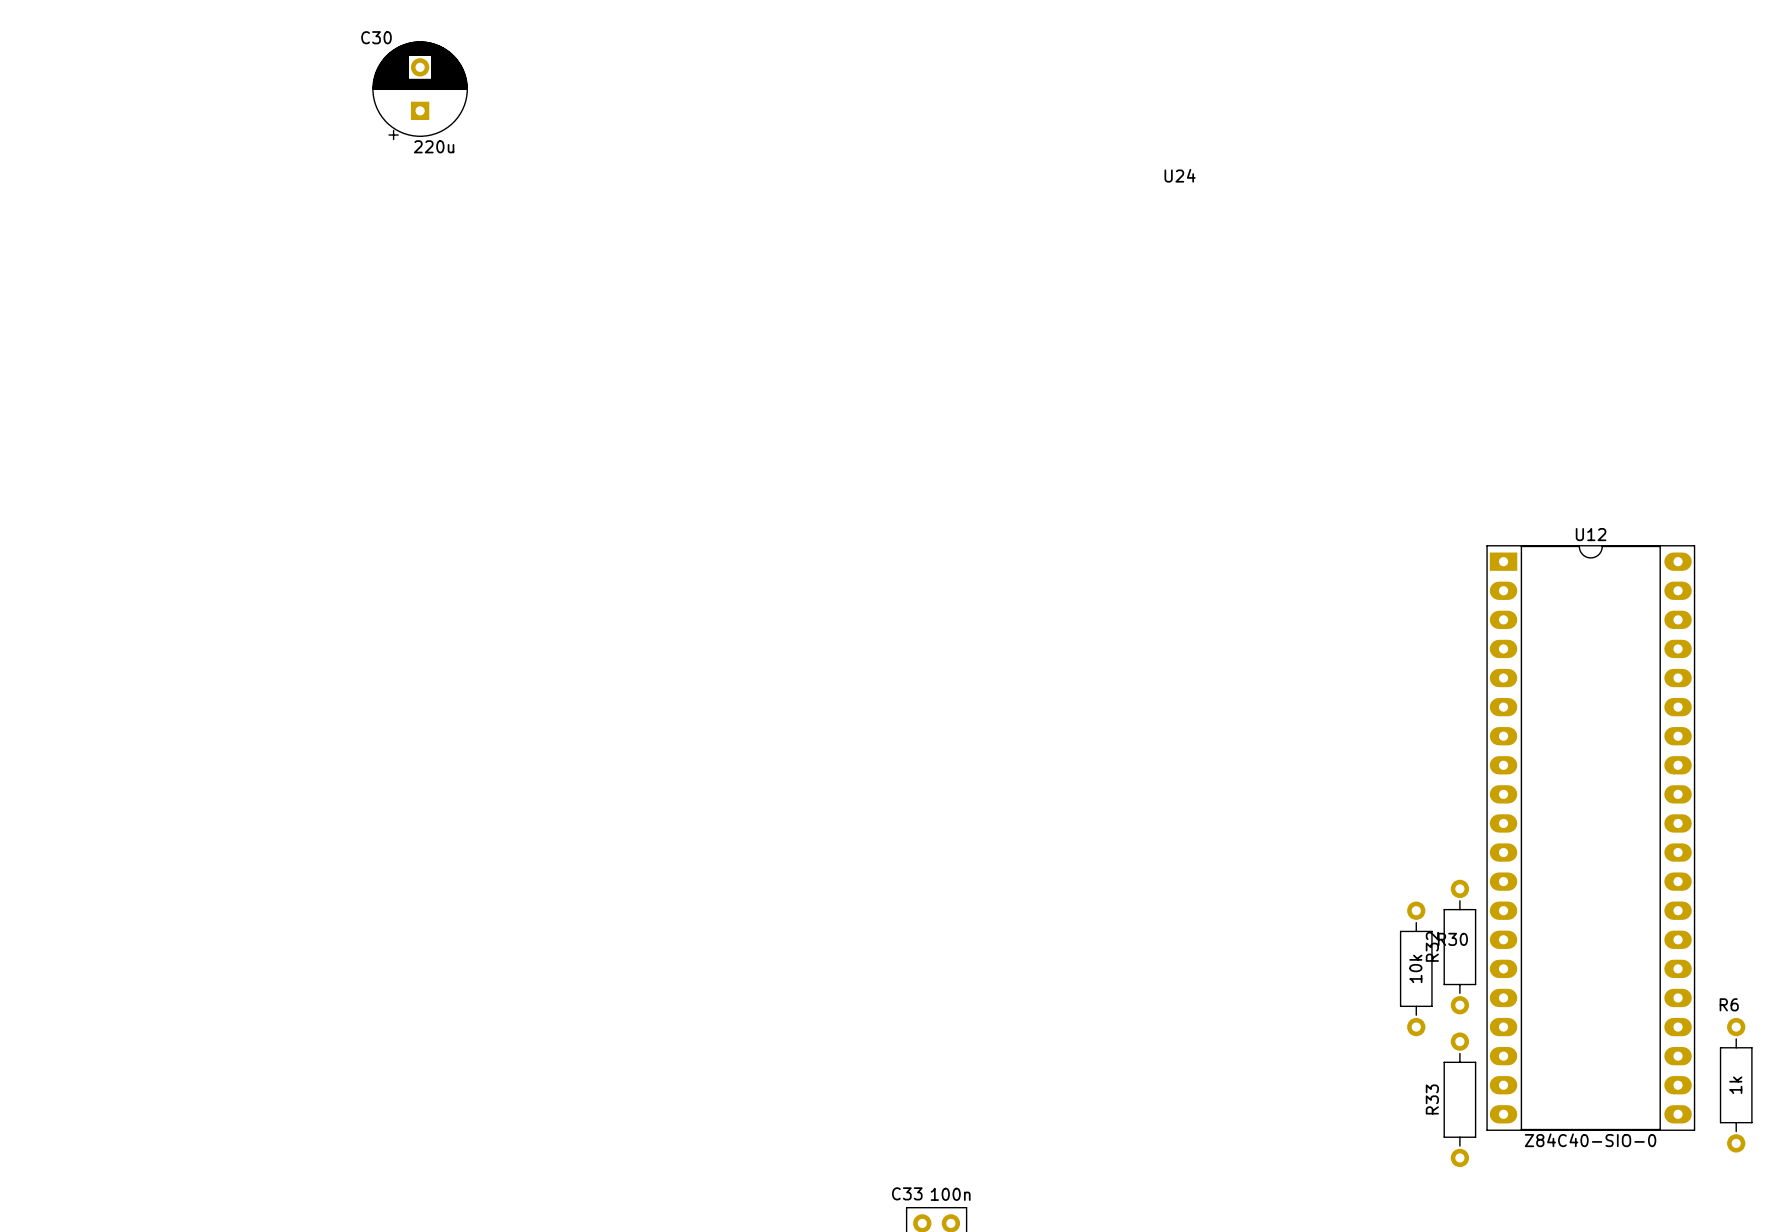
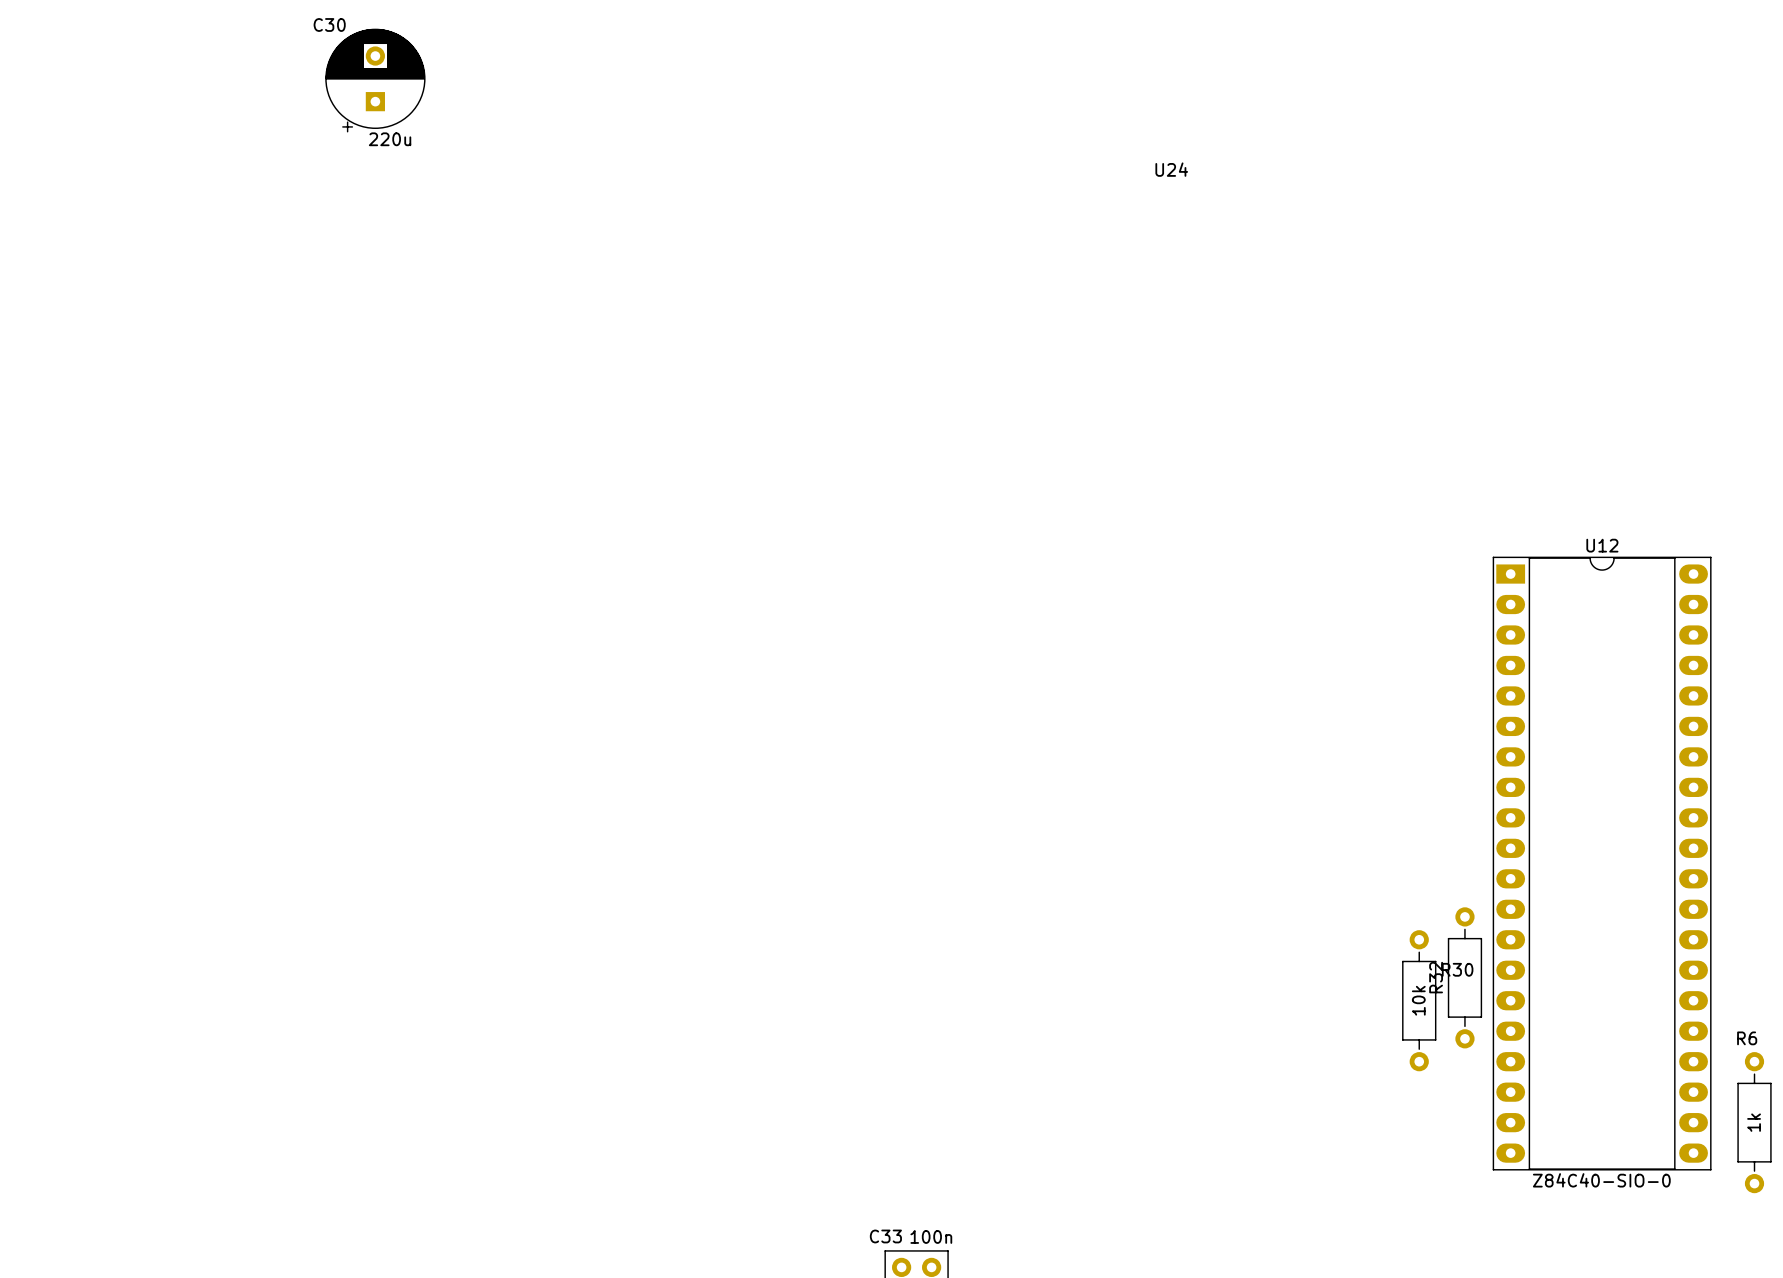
R33: (1459, 1099) -> none

